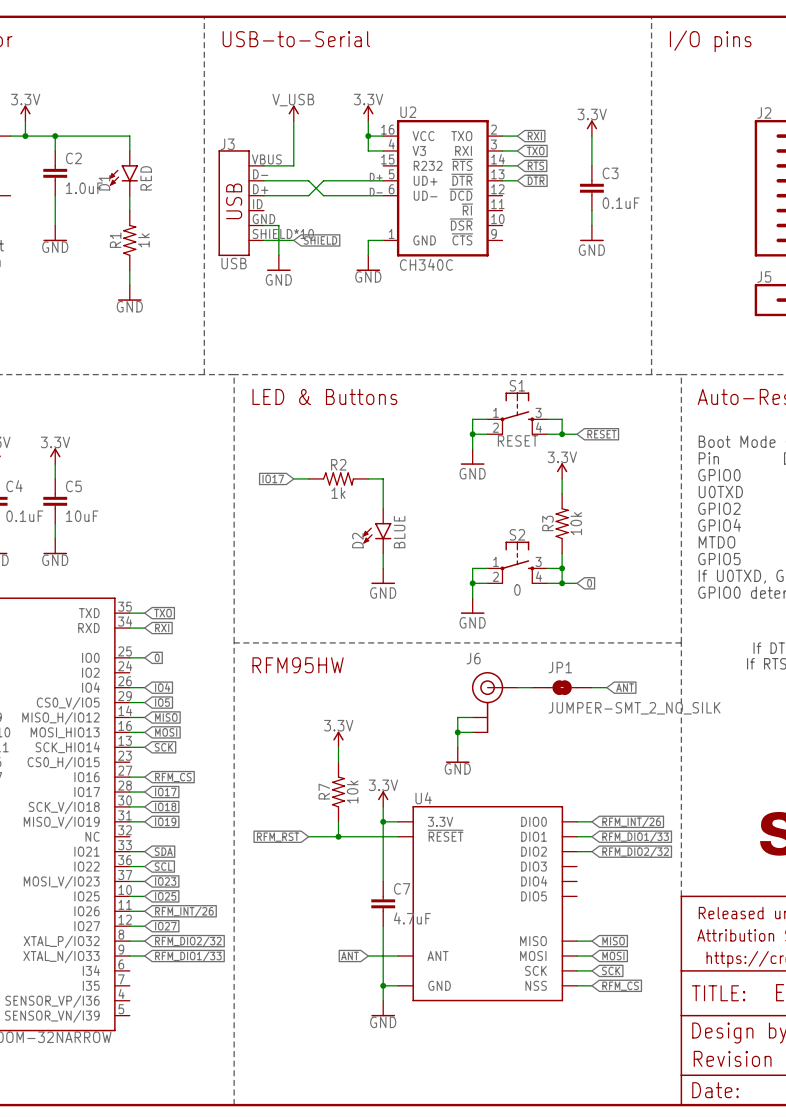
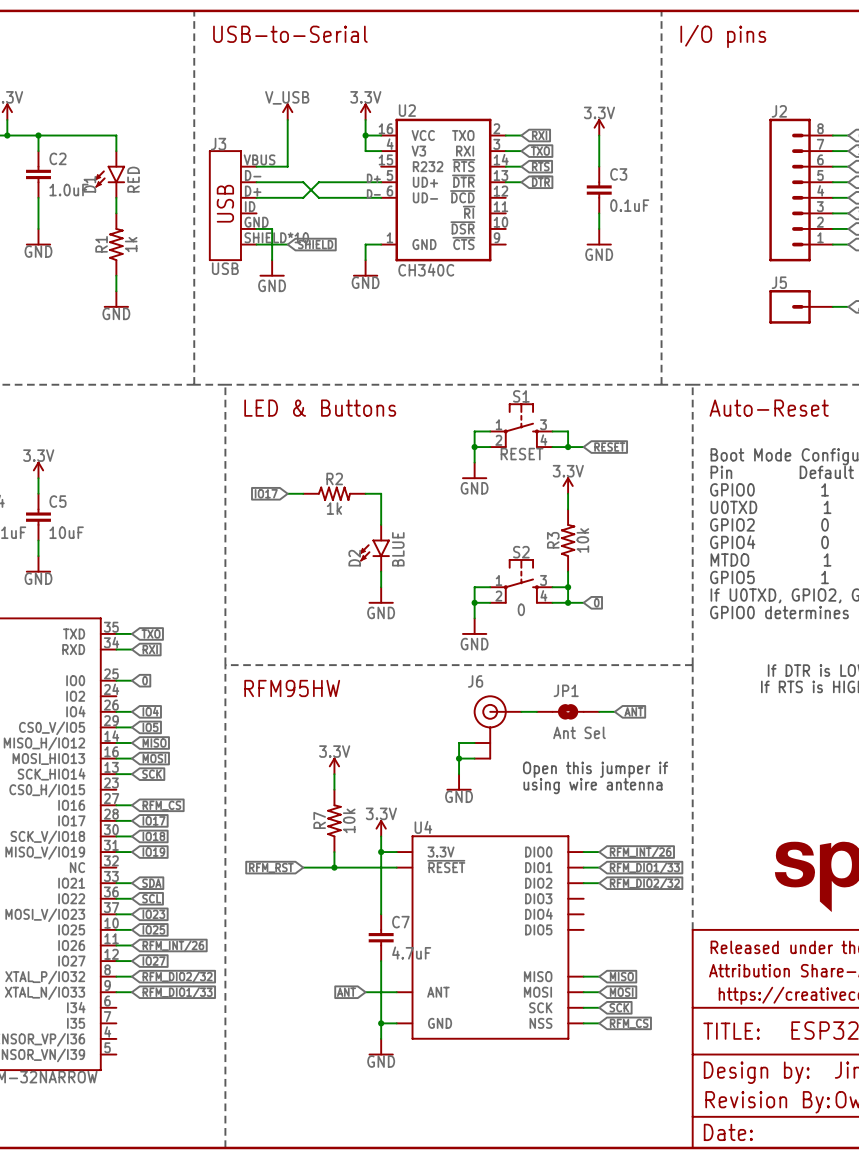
JP1 value: JUMPER-SMT_2_NO_SILK (634, 708) -> Ant Sel (579, 732)
text: none -> Open this jumper if (595, 769)
text: none -> using wire antenna (592, 786)

